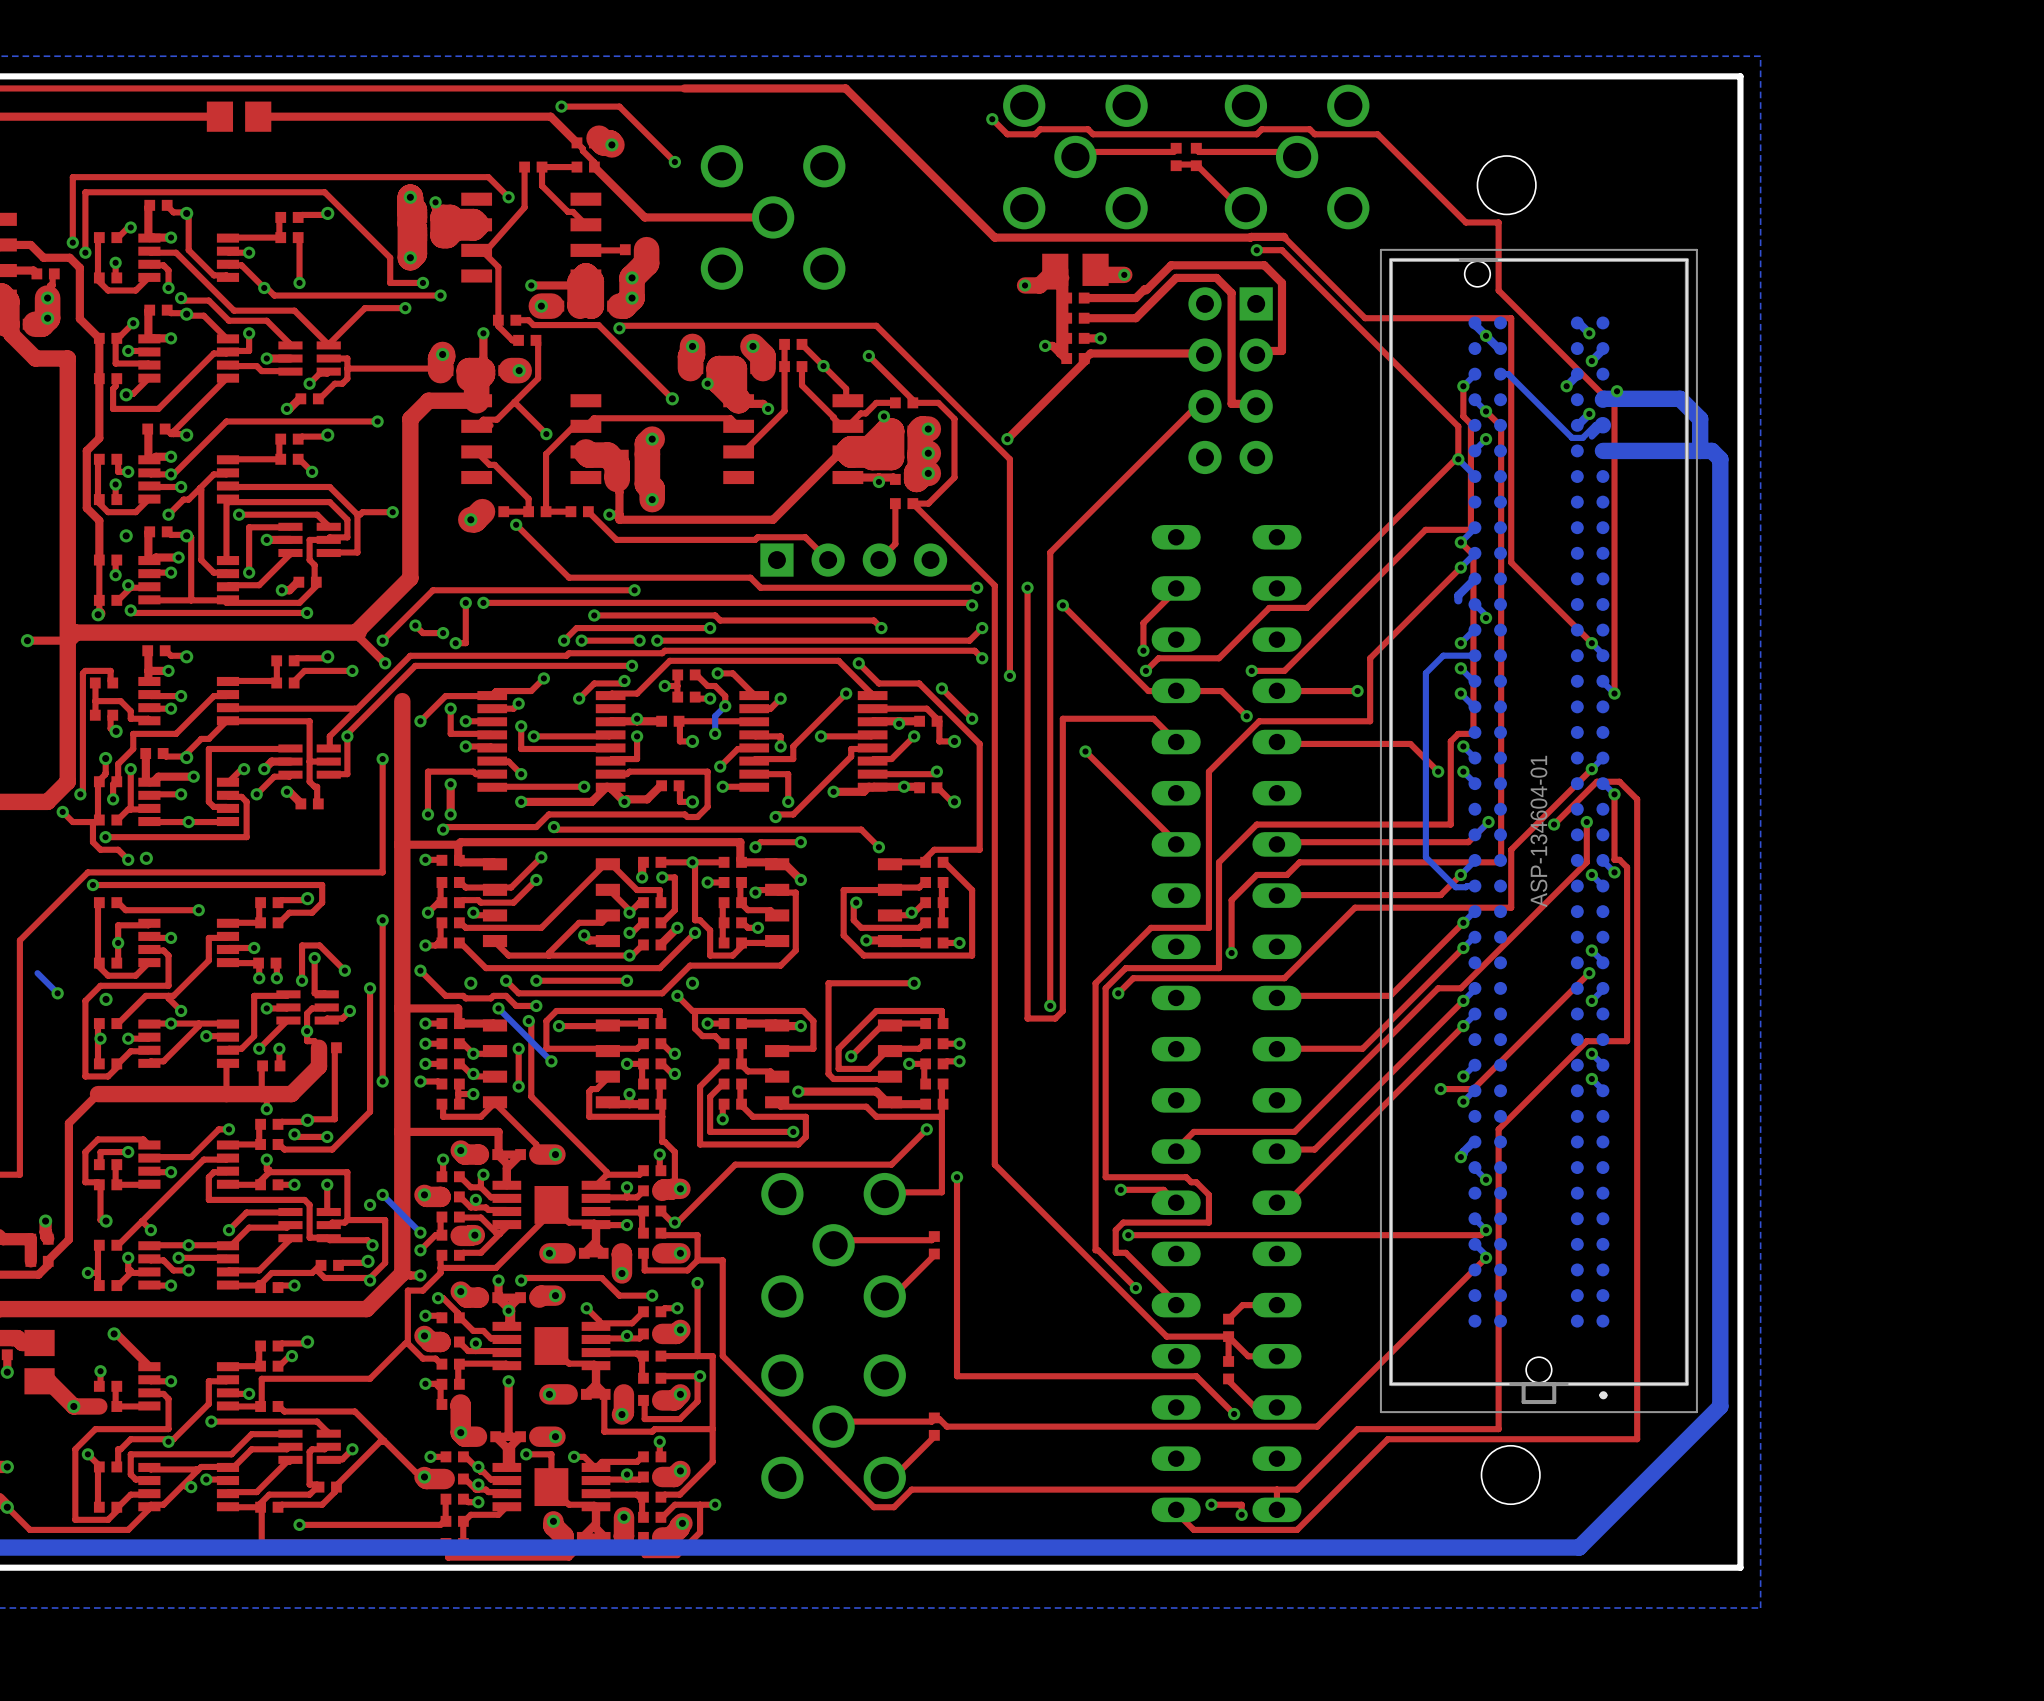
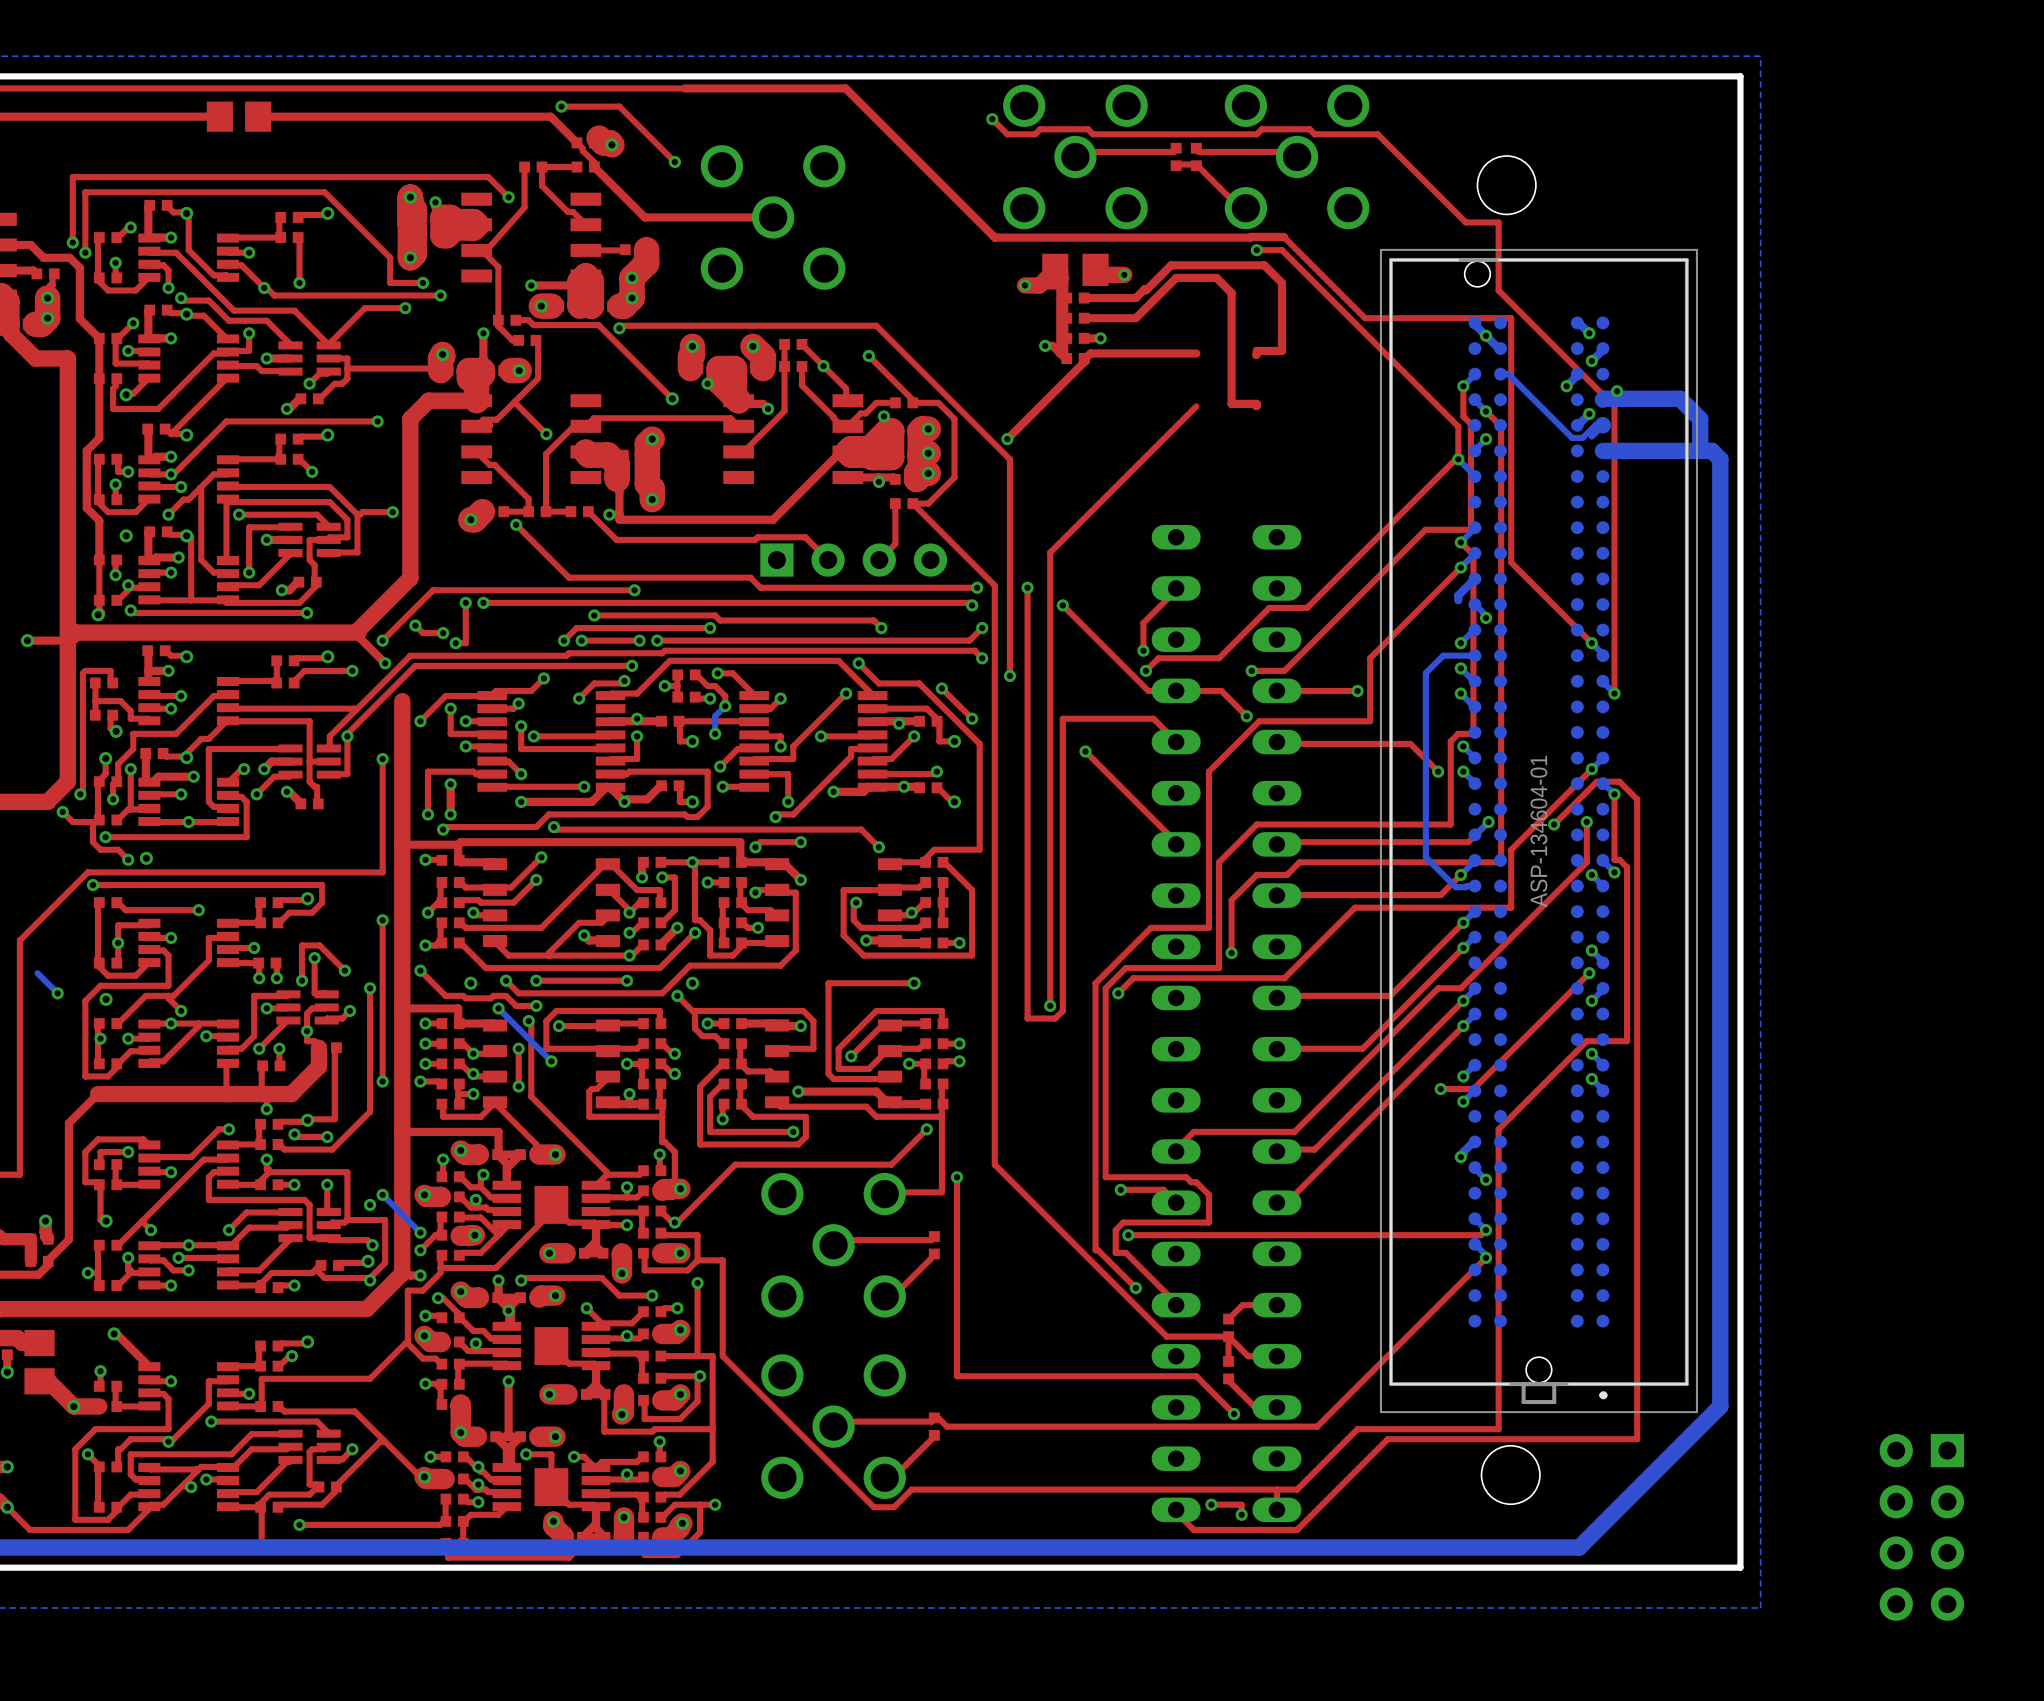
part: (1230, 380) -> none
part: none -> (1921, 1527)

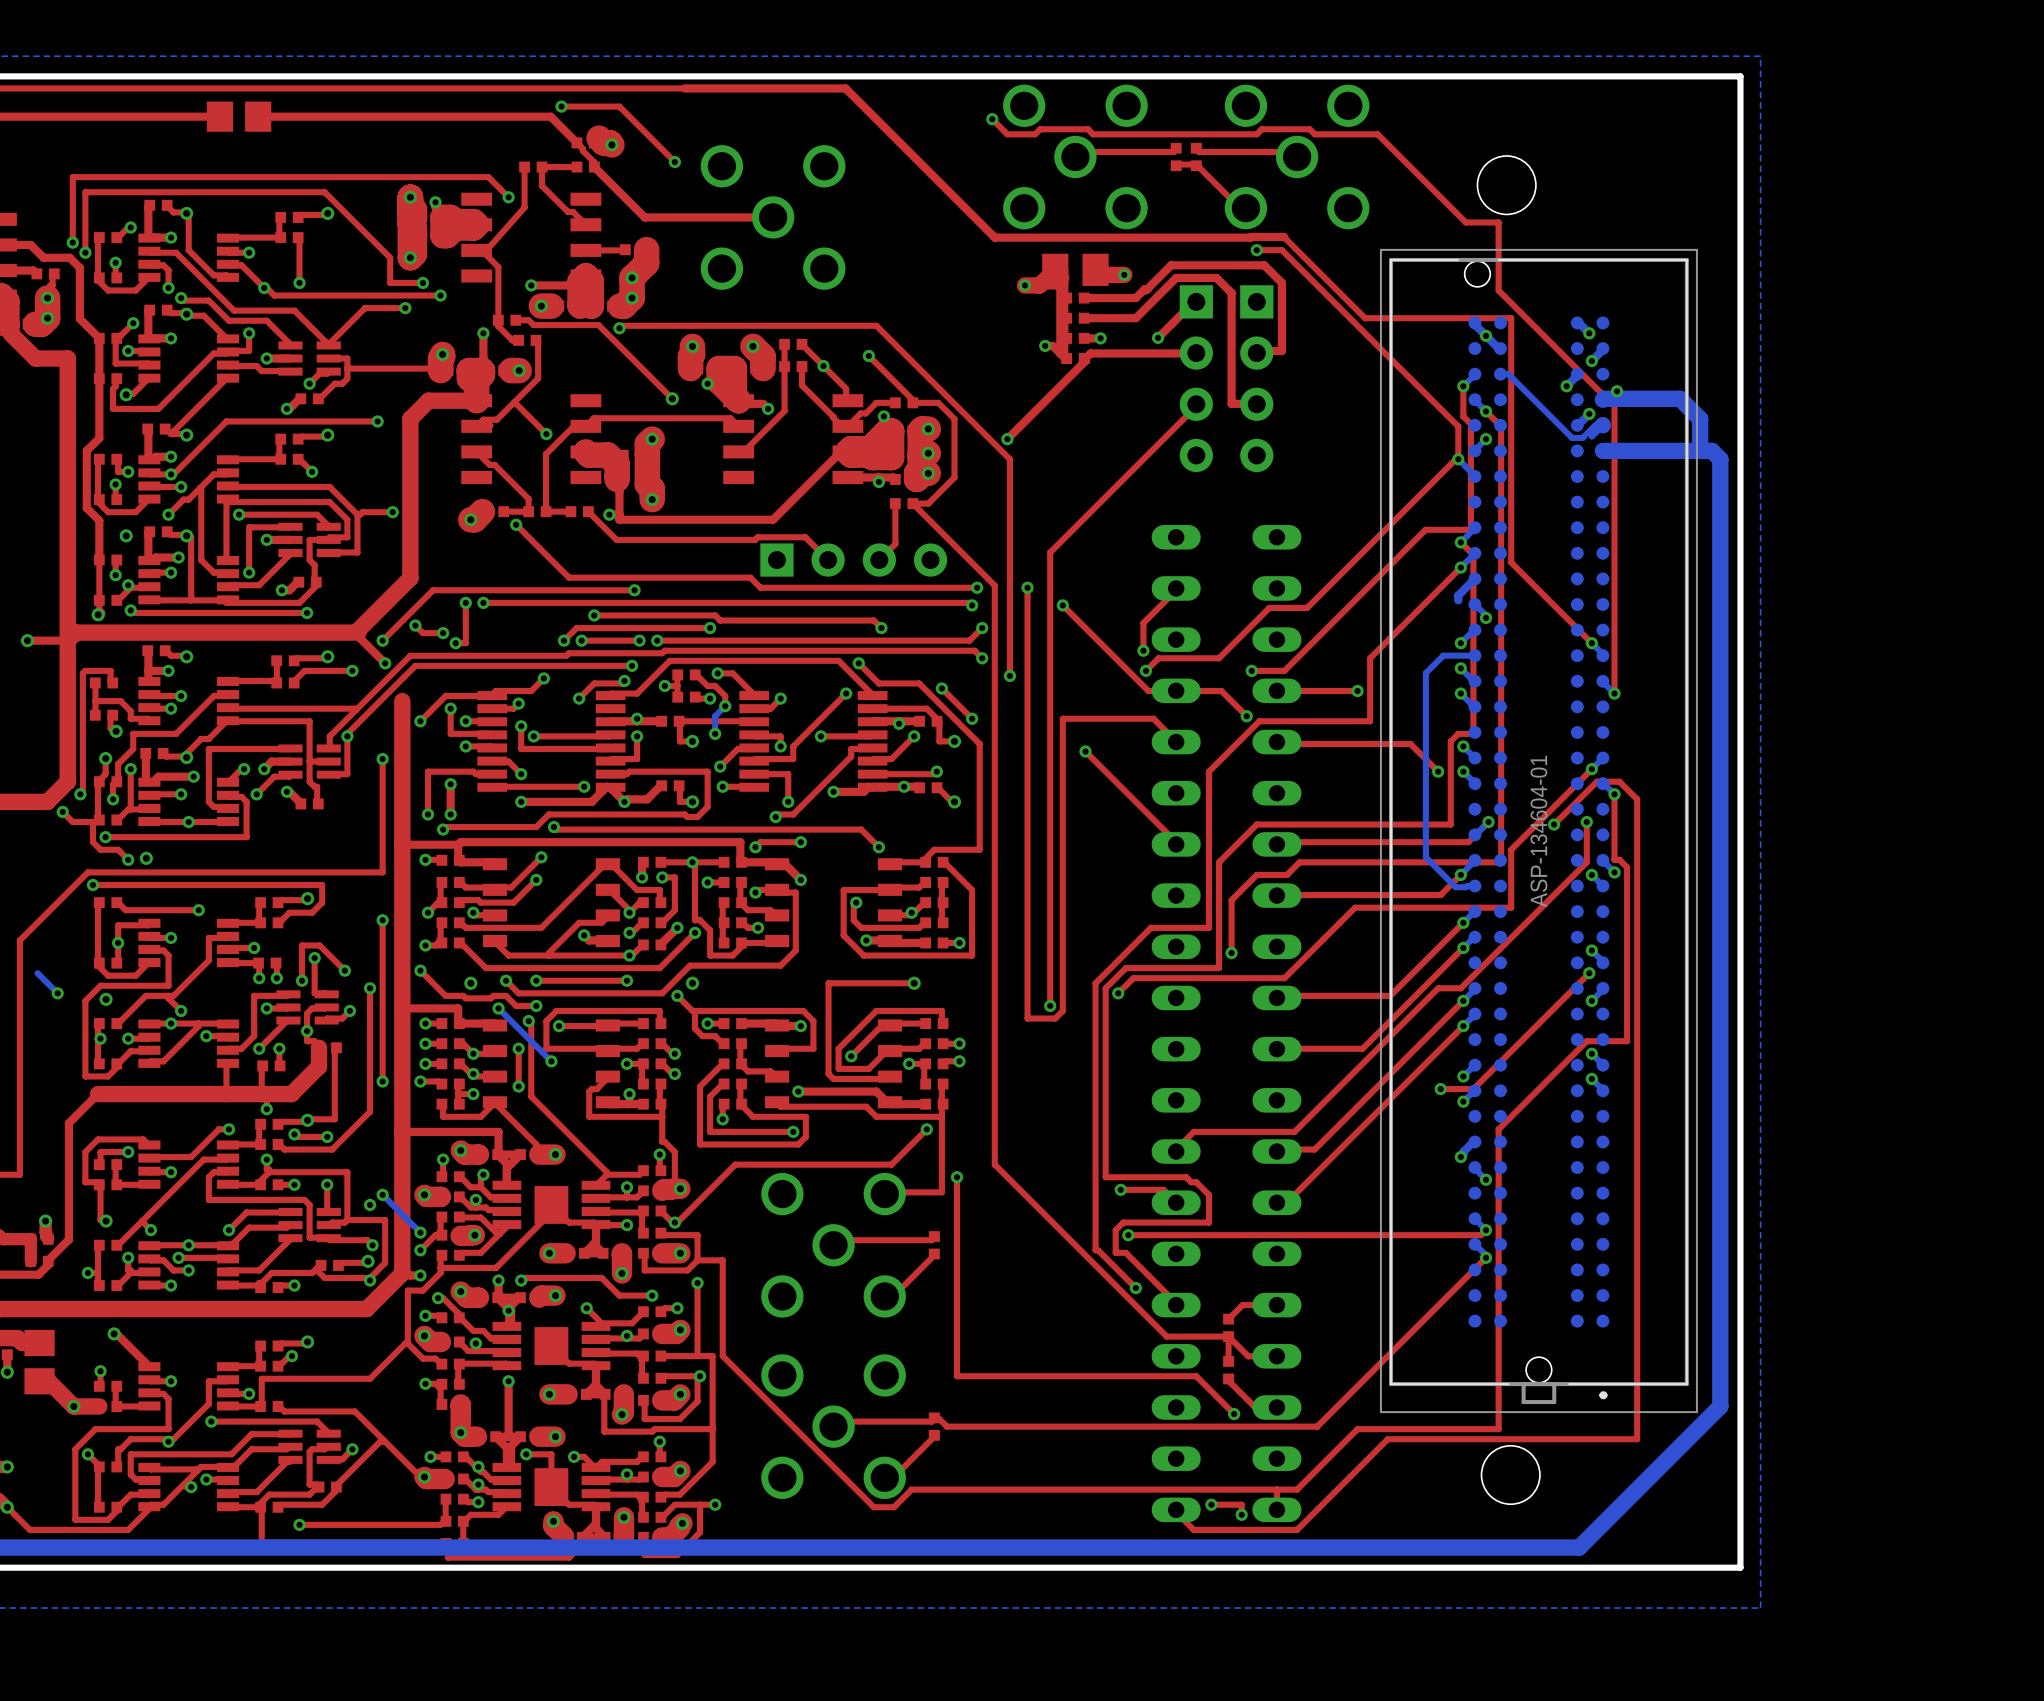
top track: none -> (1196, 301) (1194, 301) (1158, 337)
via: none -> (1158, 337)
part: none -> (1196, 378)
part: none -> (1256, 378)
part: (1921, 1527) -> none

